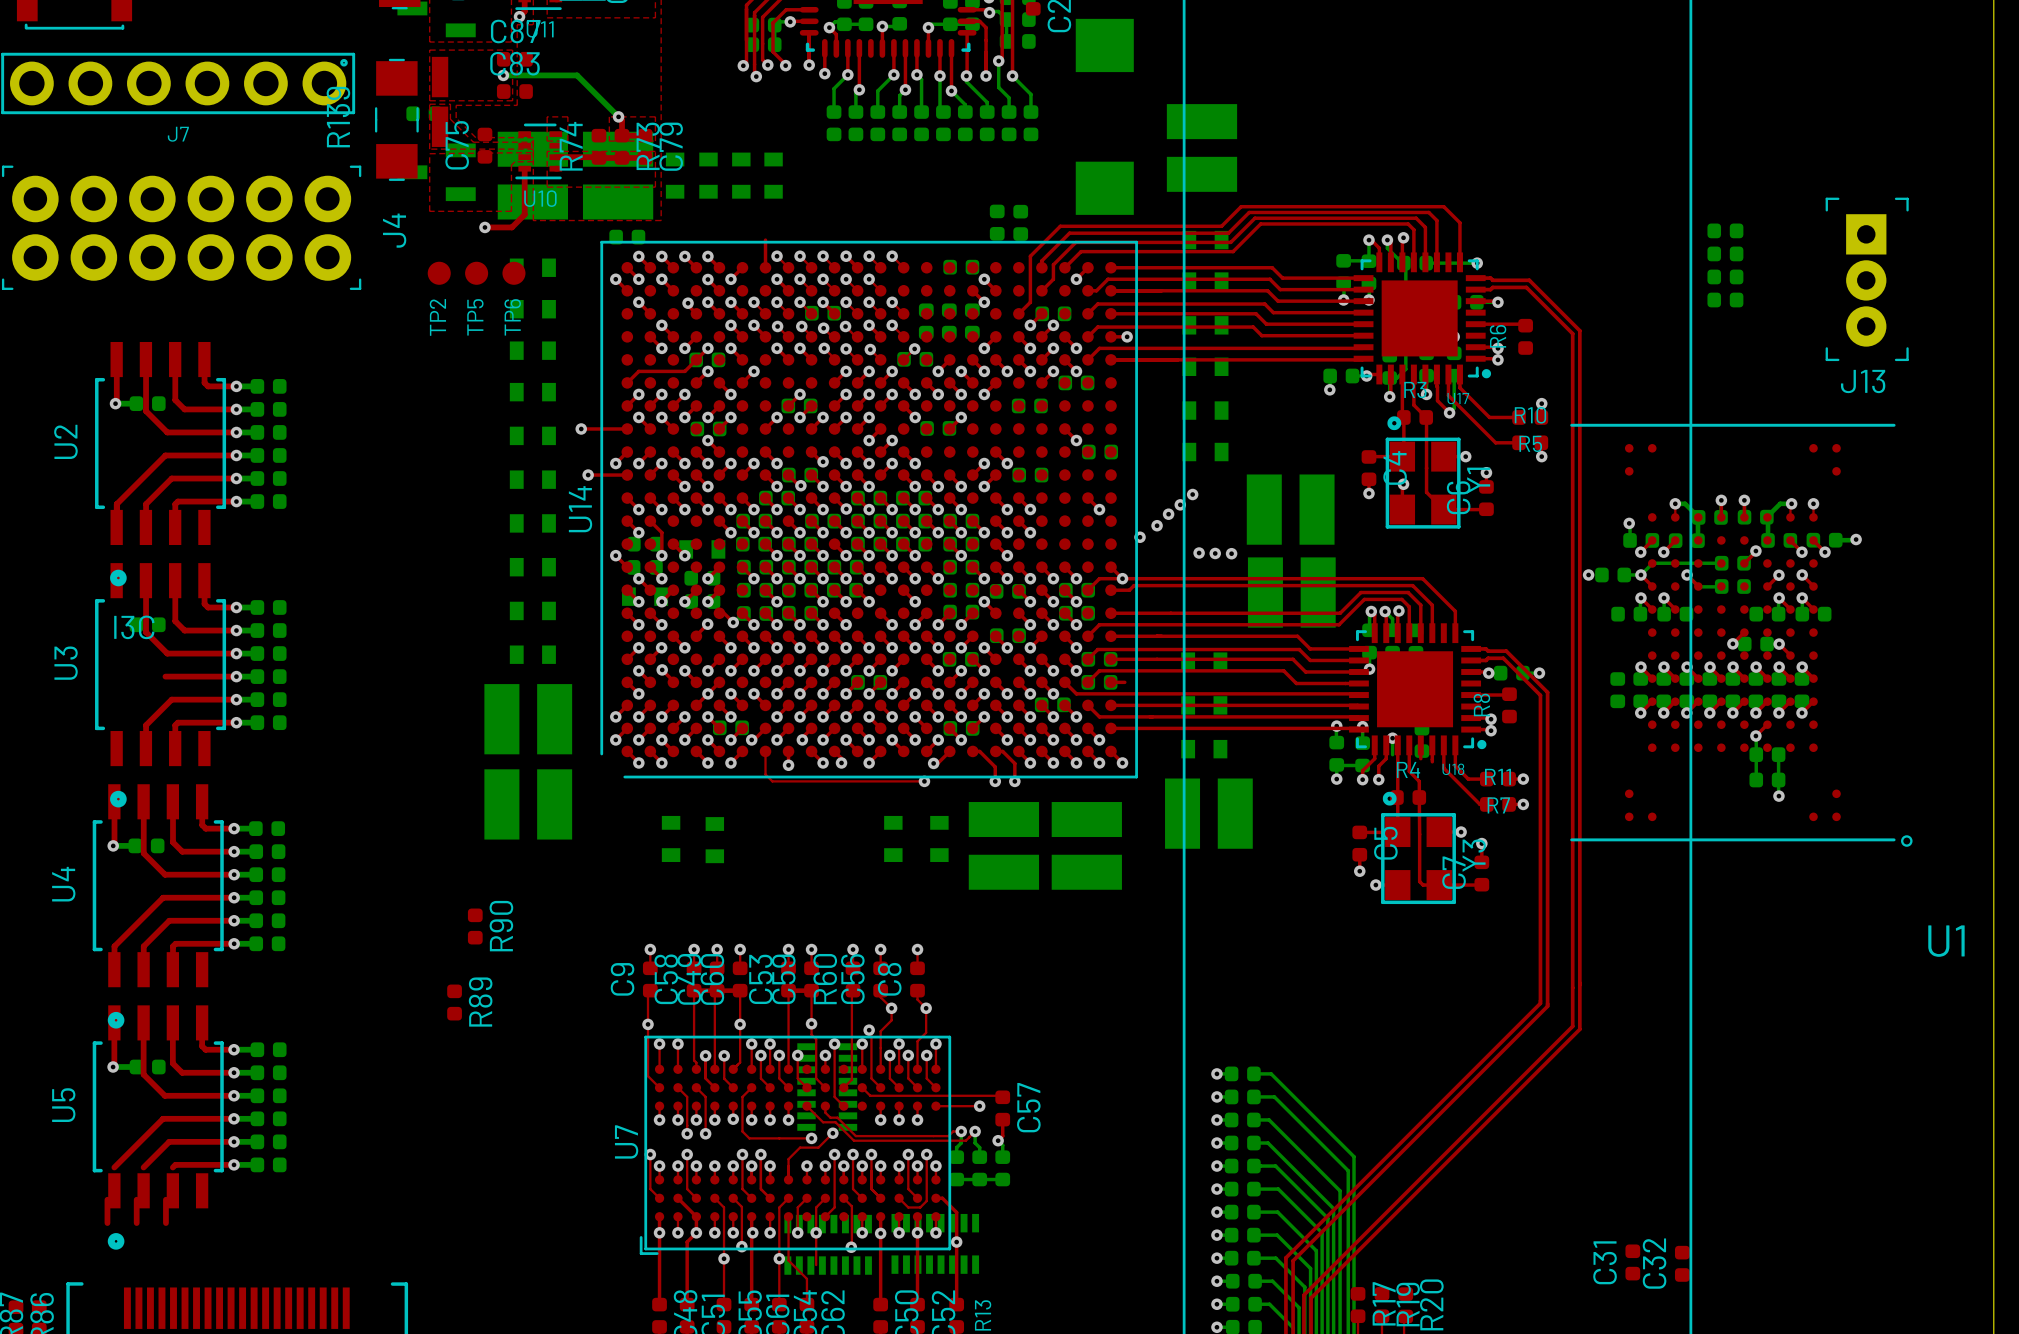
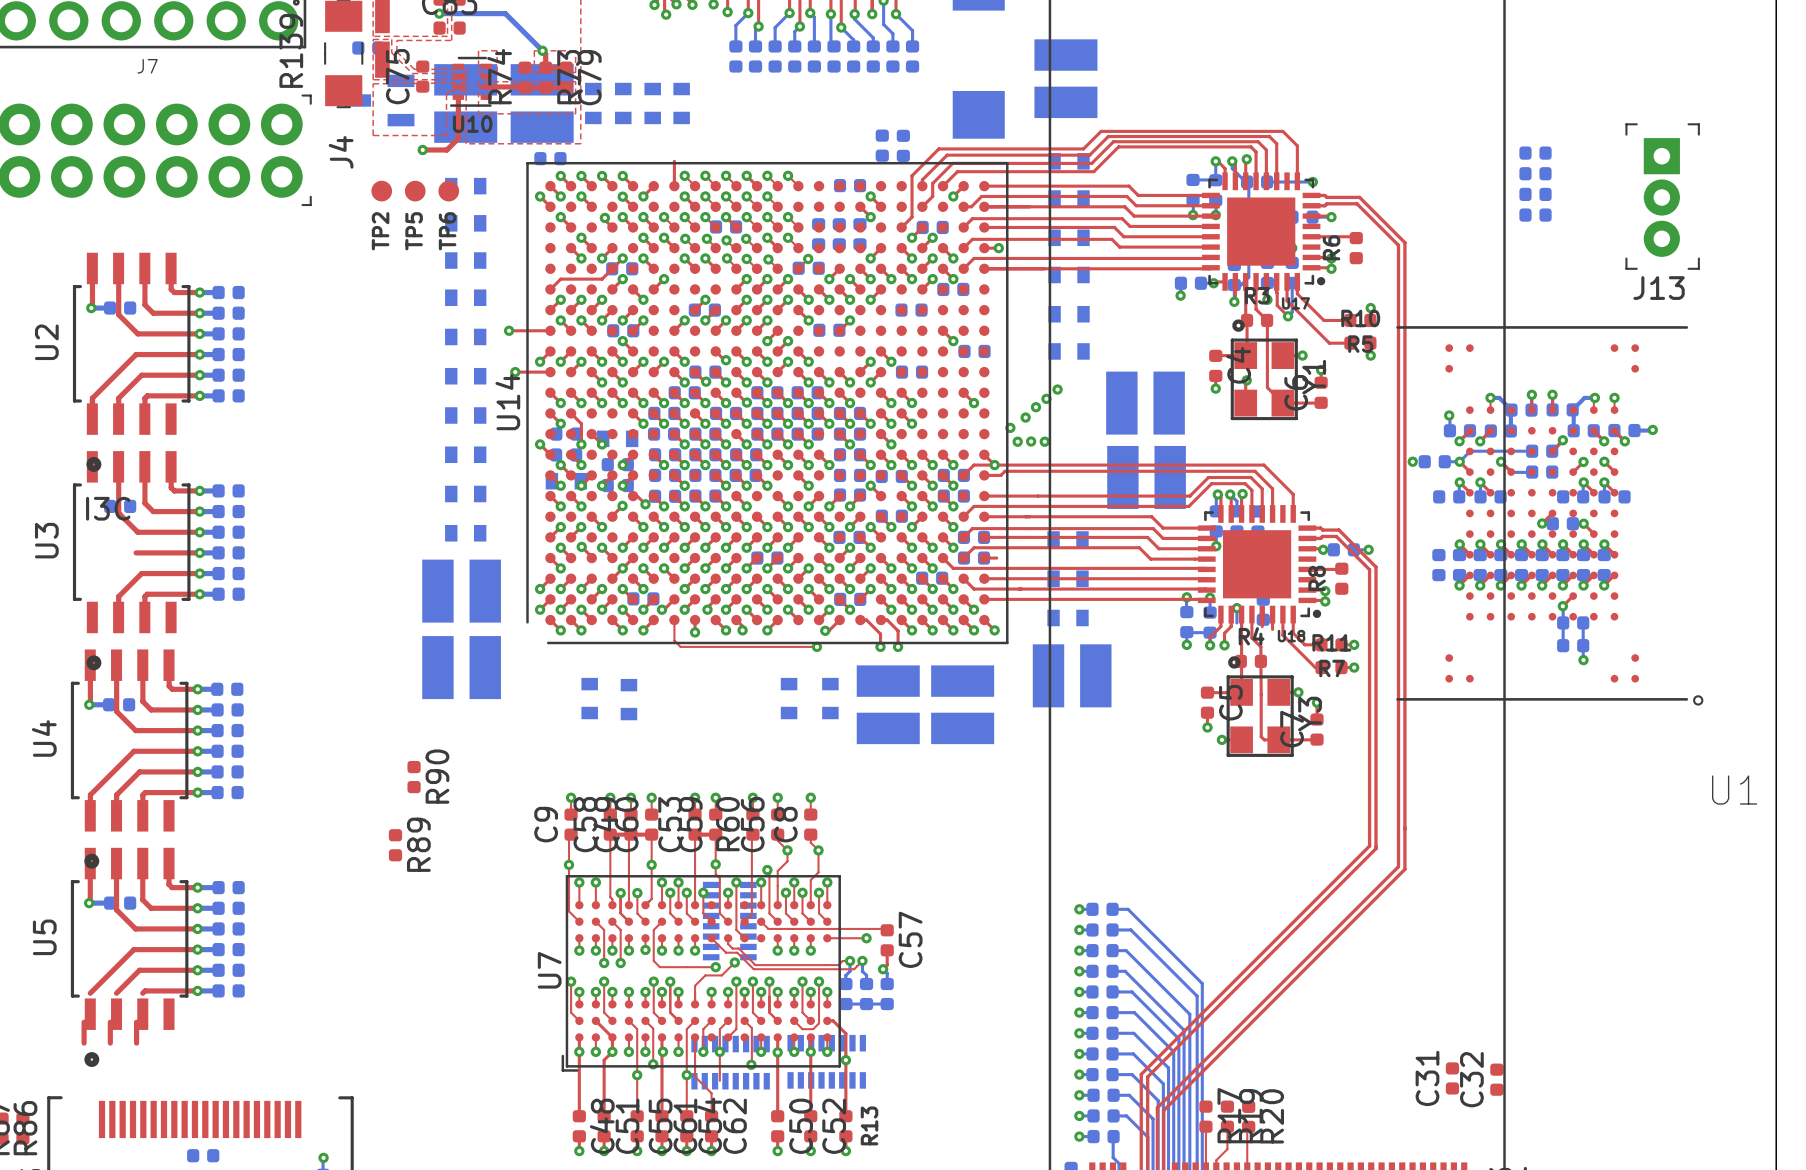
via: none -> (1017, 441)
via: none -> (1031, 441)
via: none -> (1044, 441)
via: (1199, 553) -> none
via: (1215, 553) -> none
via: (1231, 553) -> none

